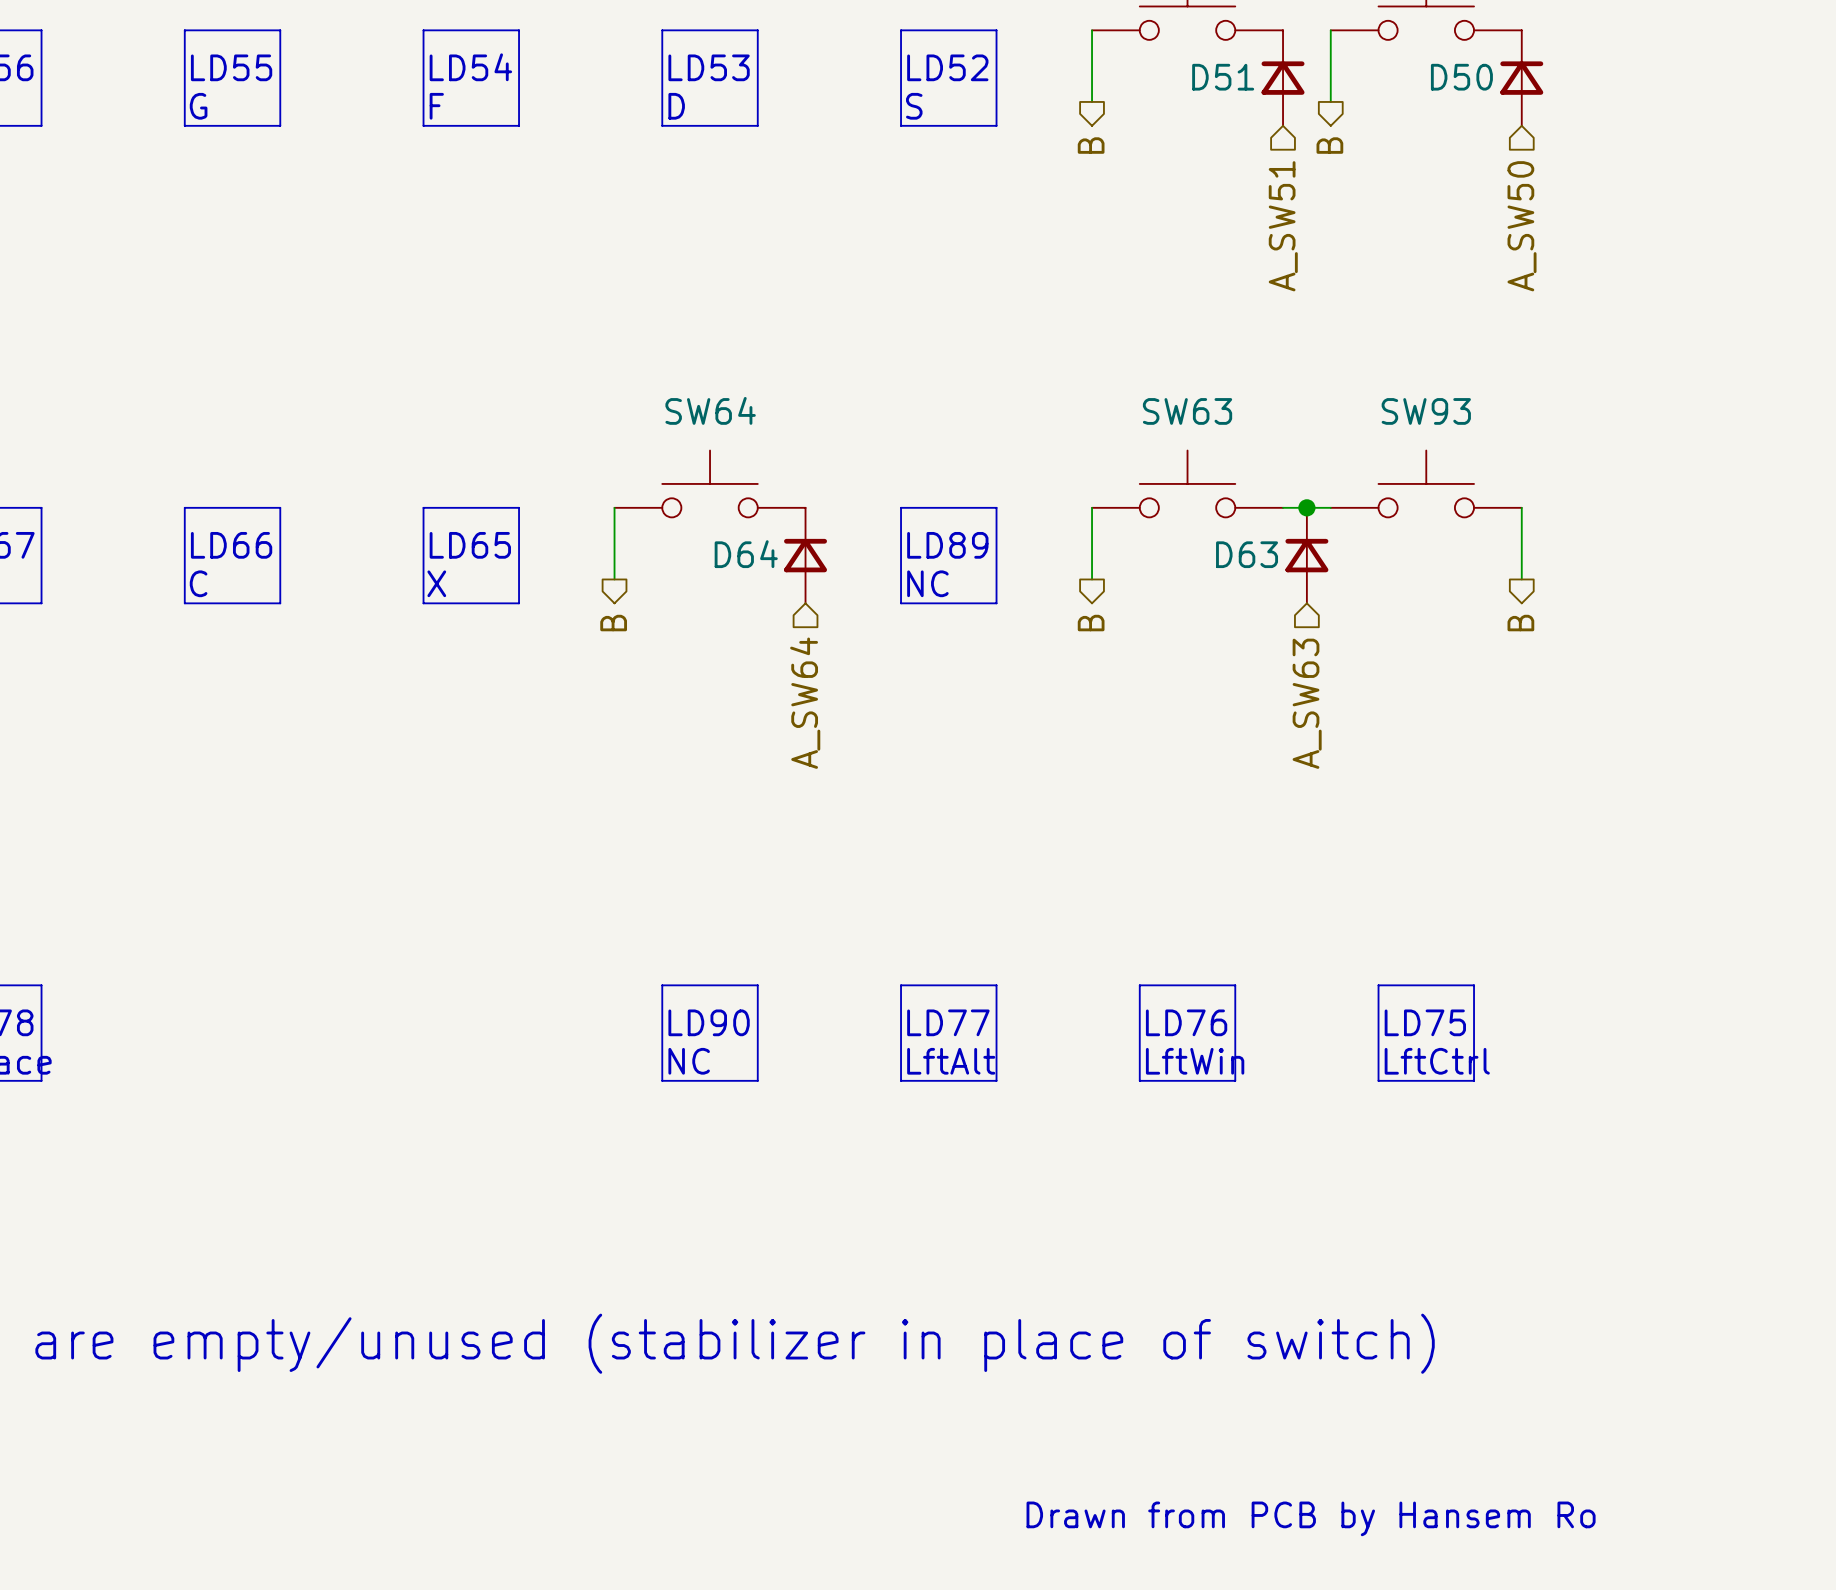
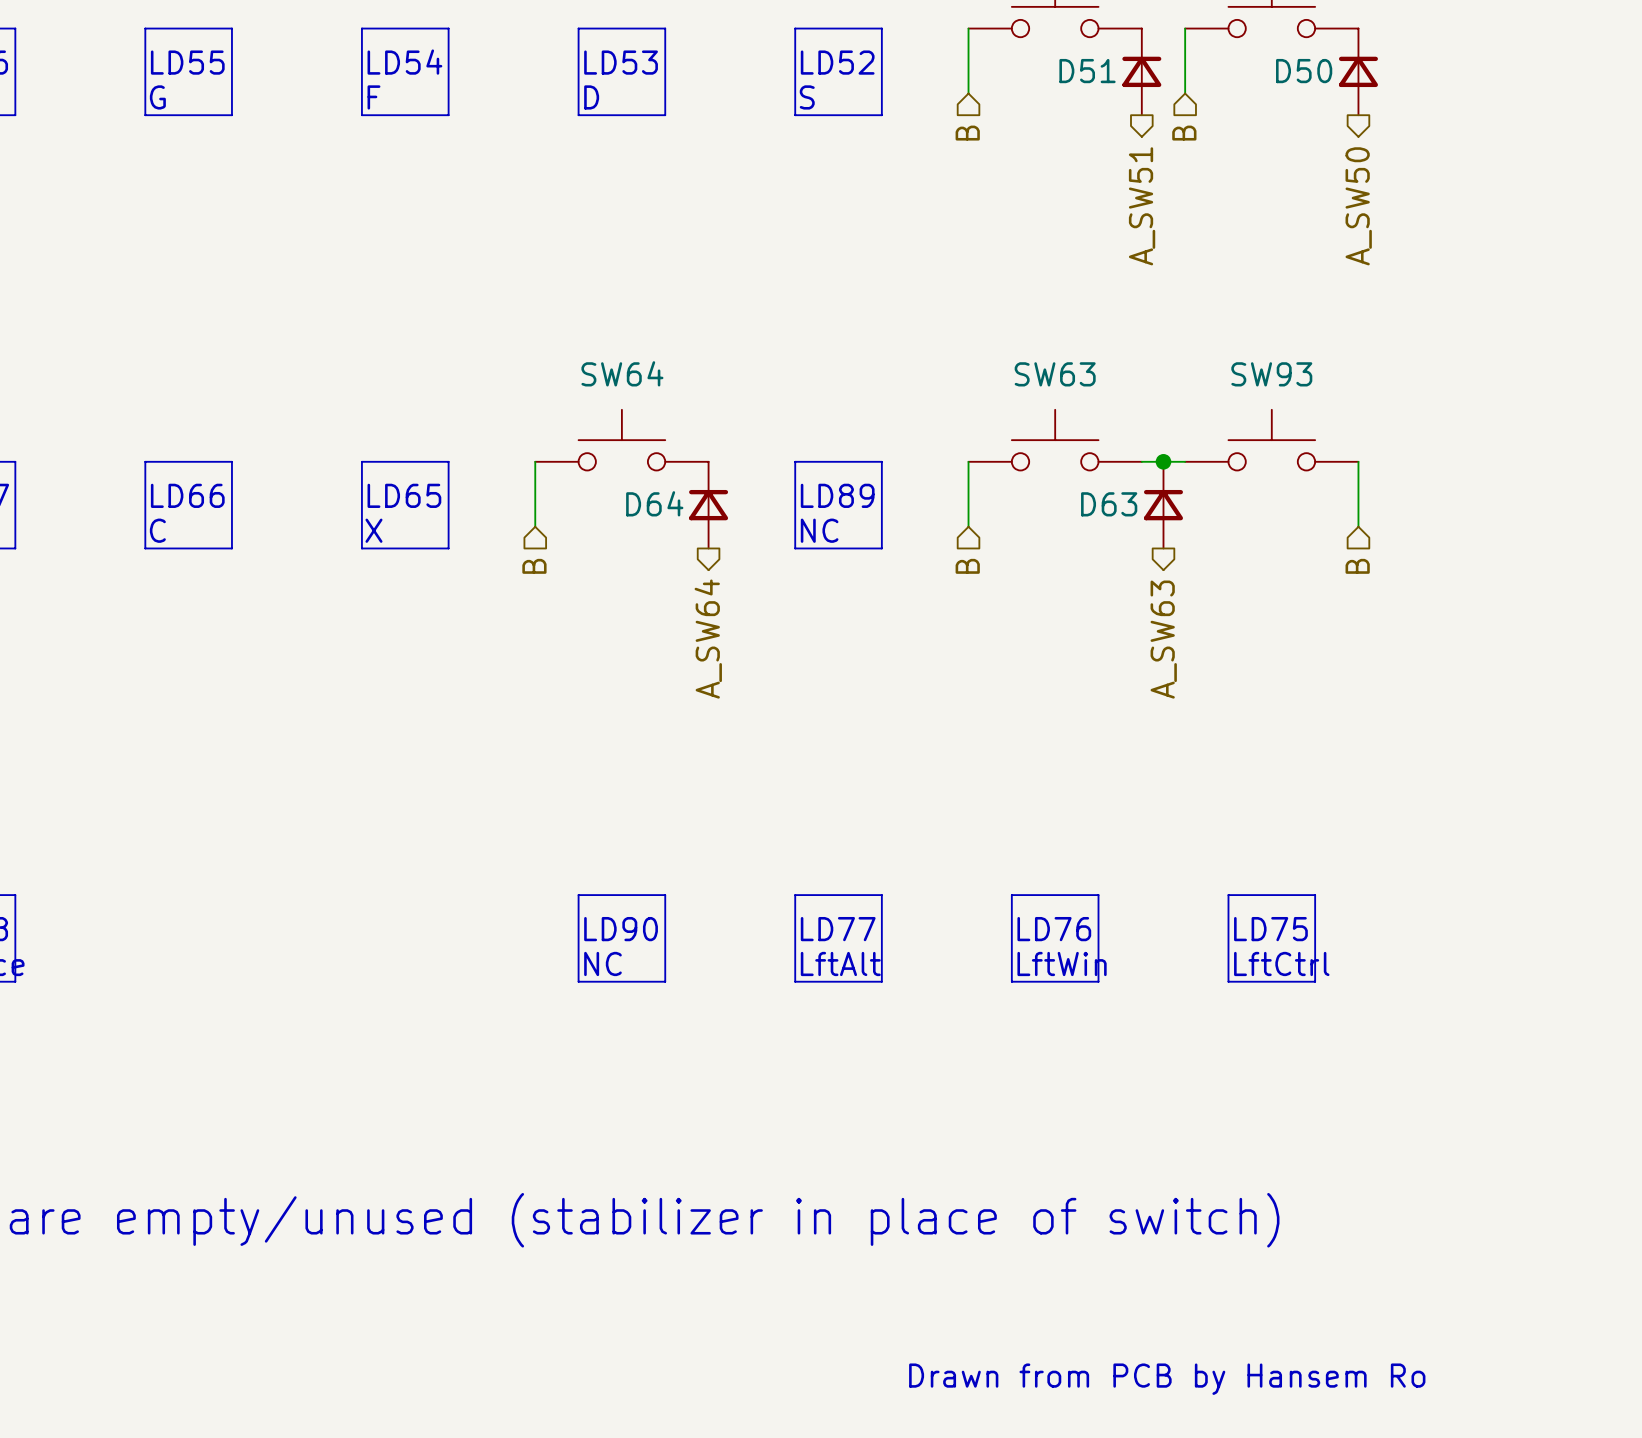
hierarchical label shape: output (1091, 145) -> input (967, 133)
hierarchical label shape: output (1329, 145) -> input (1184, 133)
hierarchical label shape: input (1283, 226) -> output (1142, 206)
hierarchical label shape: input (1522, 226) -> output (1358, 206)
hierarchical label shape: output (613, 623) -> input (534, 566)
hierarchical label shape: output (1091, 623) -> input (967, 566)
hierarchical label shape: output (1520, 623) -> input (1357, 566)
hierarchical label shape: input (805, 703) -> output (708, 639)
hierarchical label shape: input (1307, 703) -> output (1163, 639)

